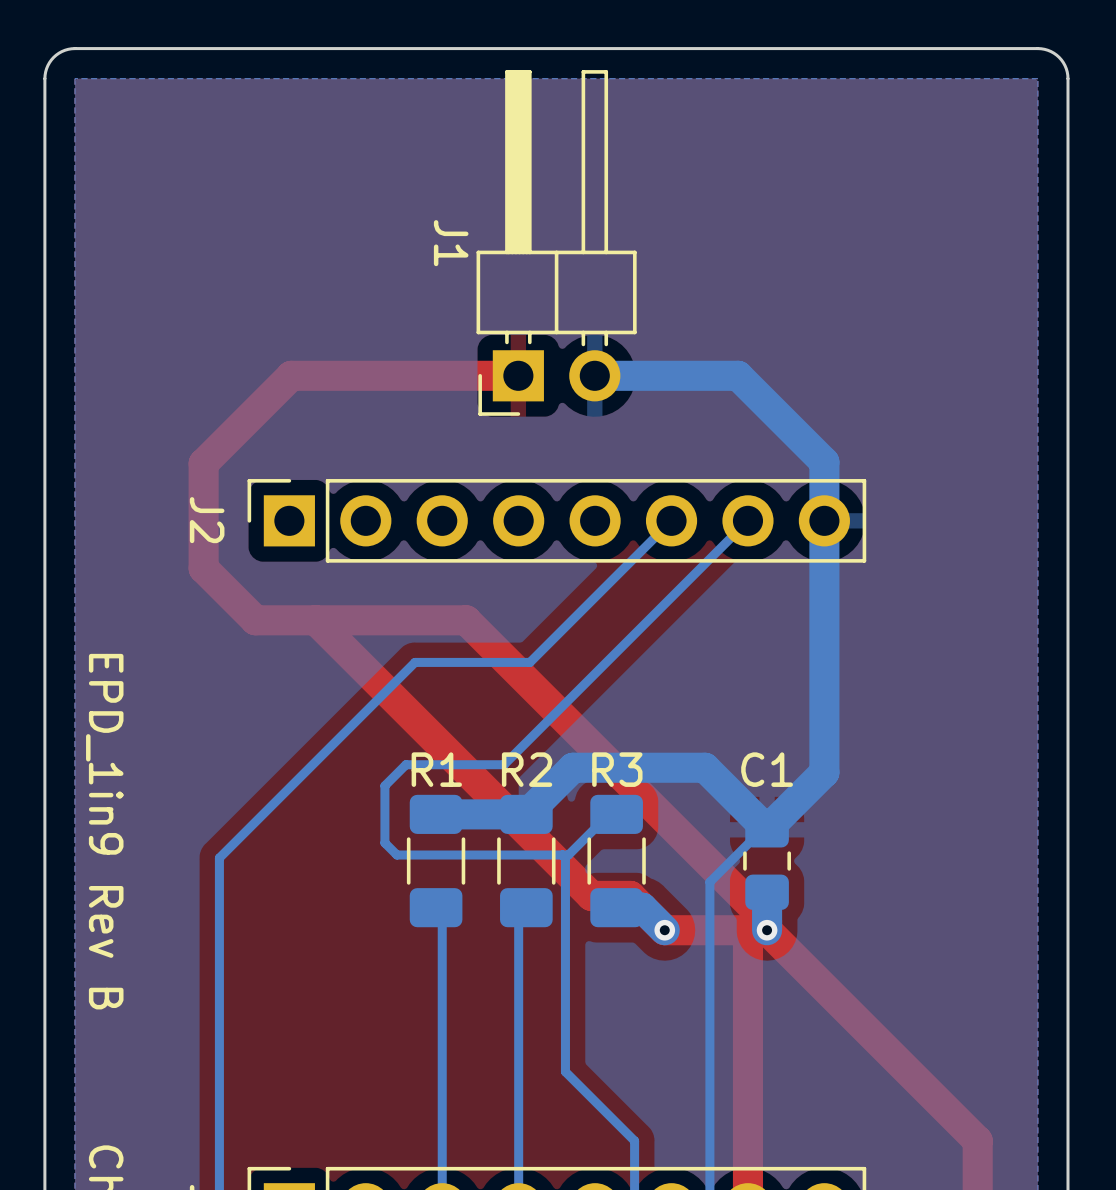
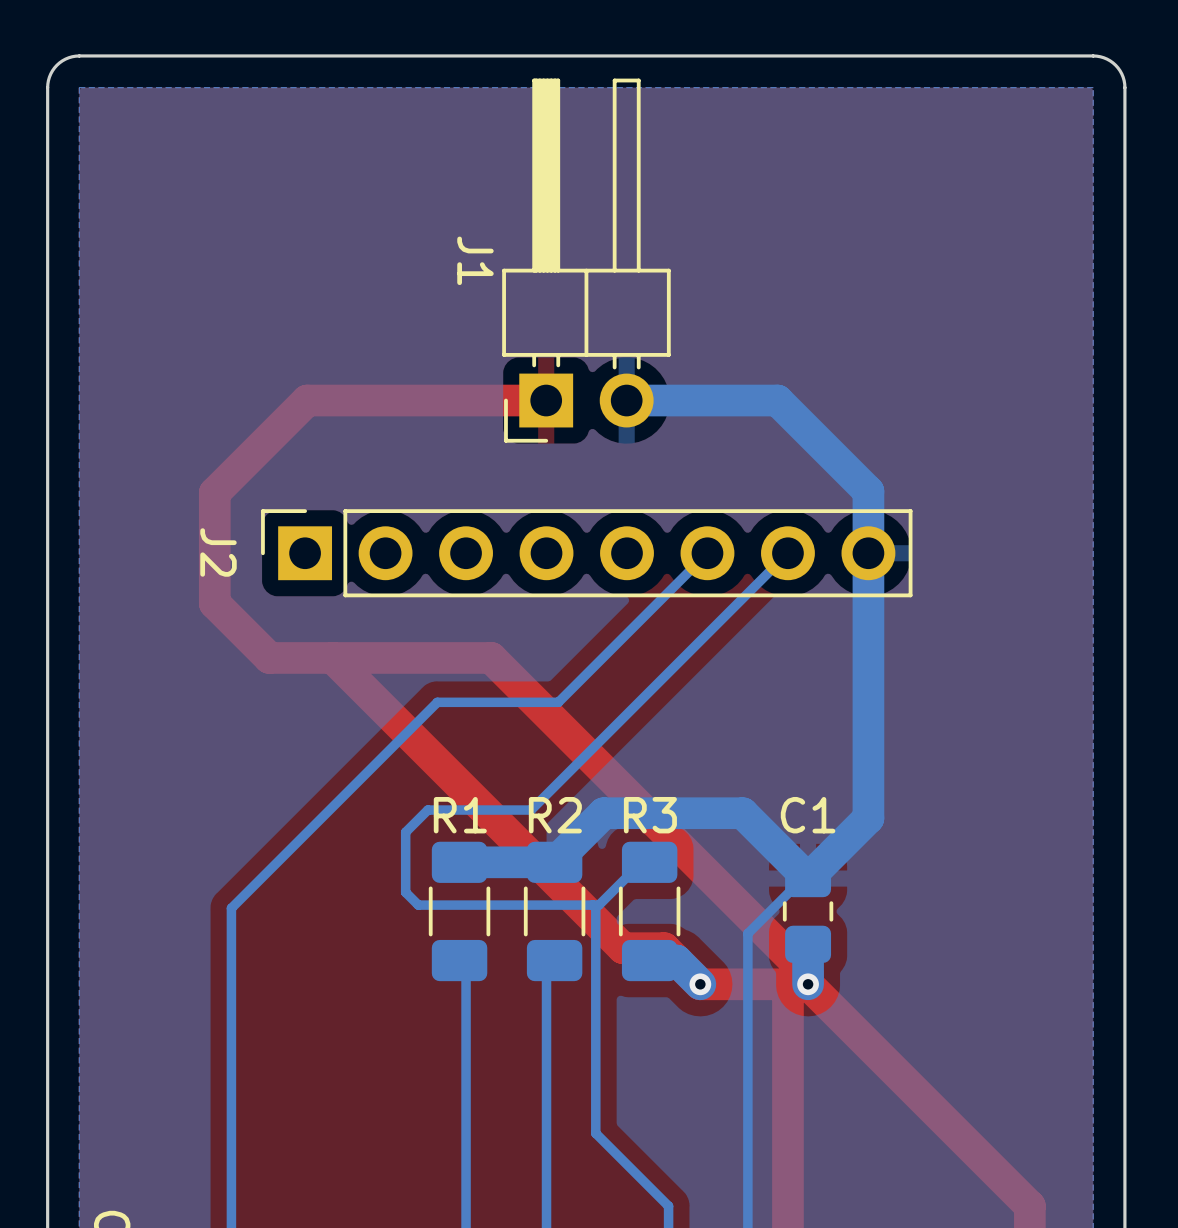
text: EPD_1in9 Rev B (104, 831) -> none

